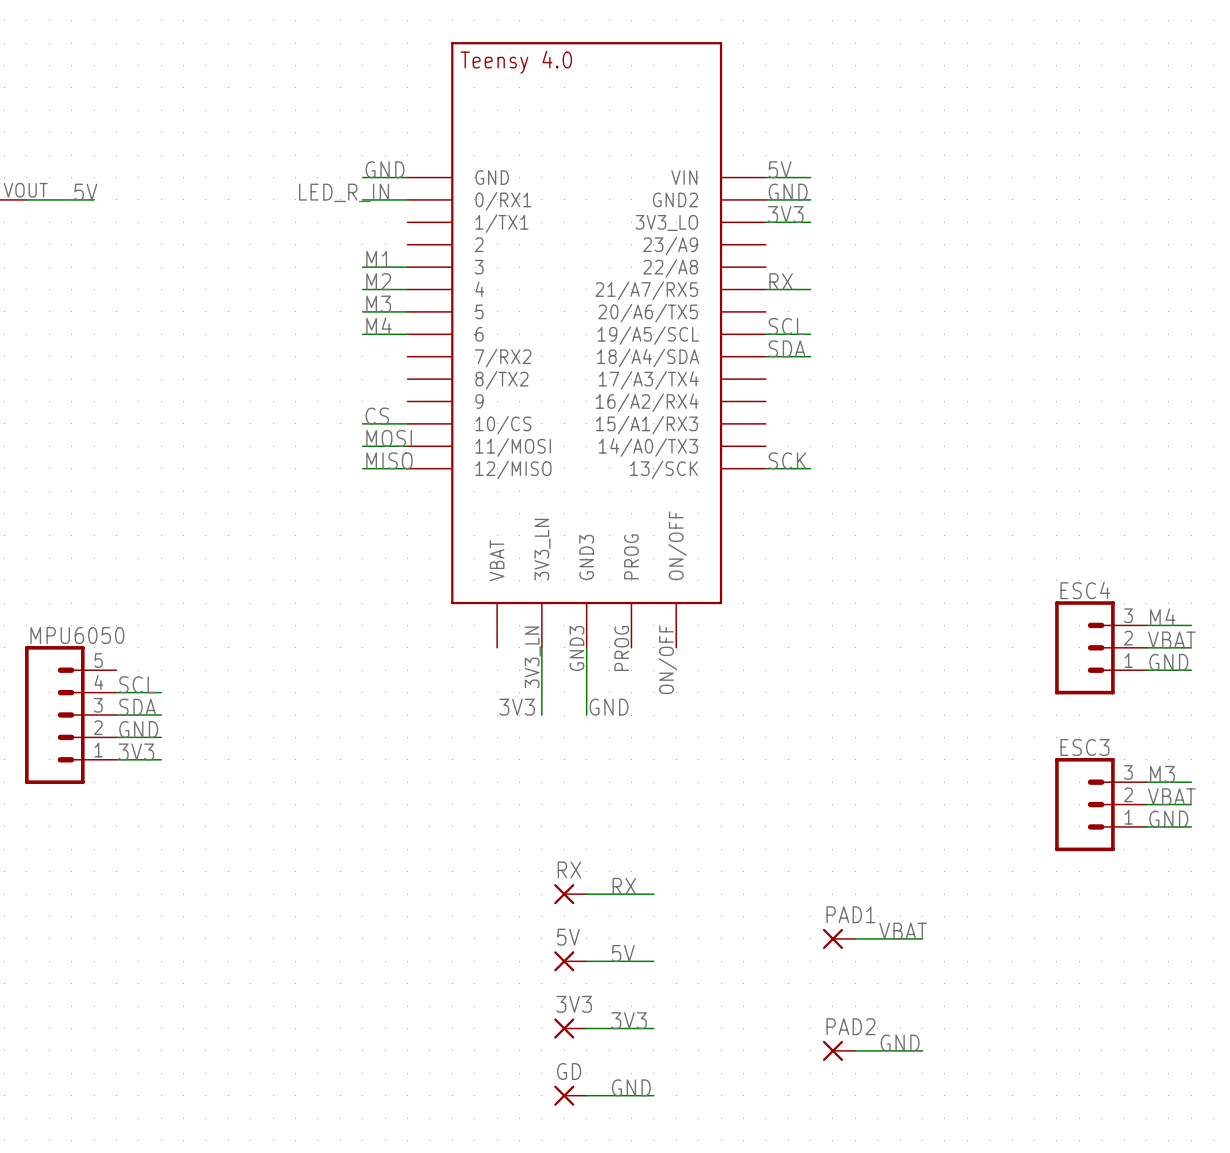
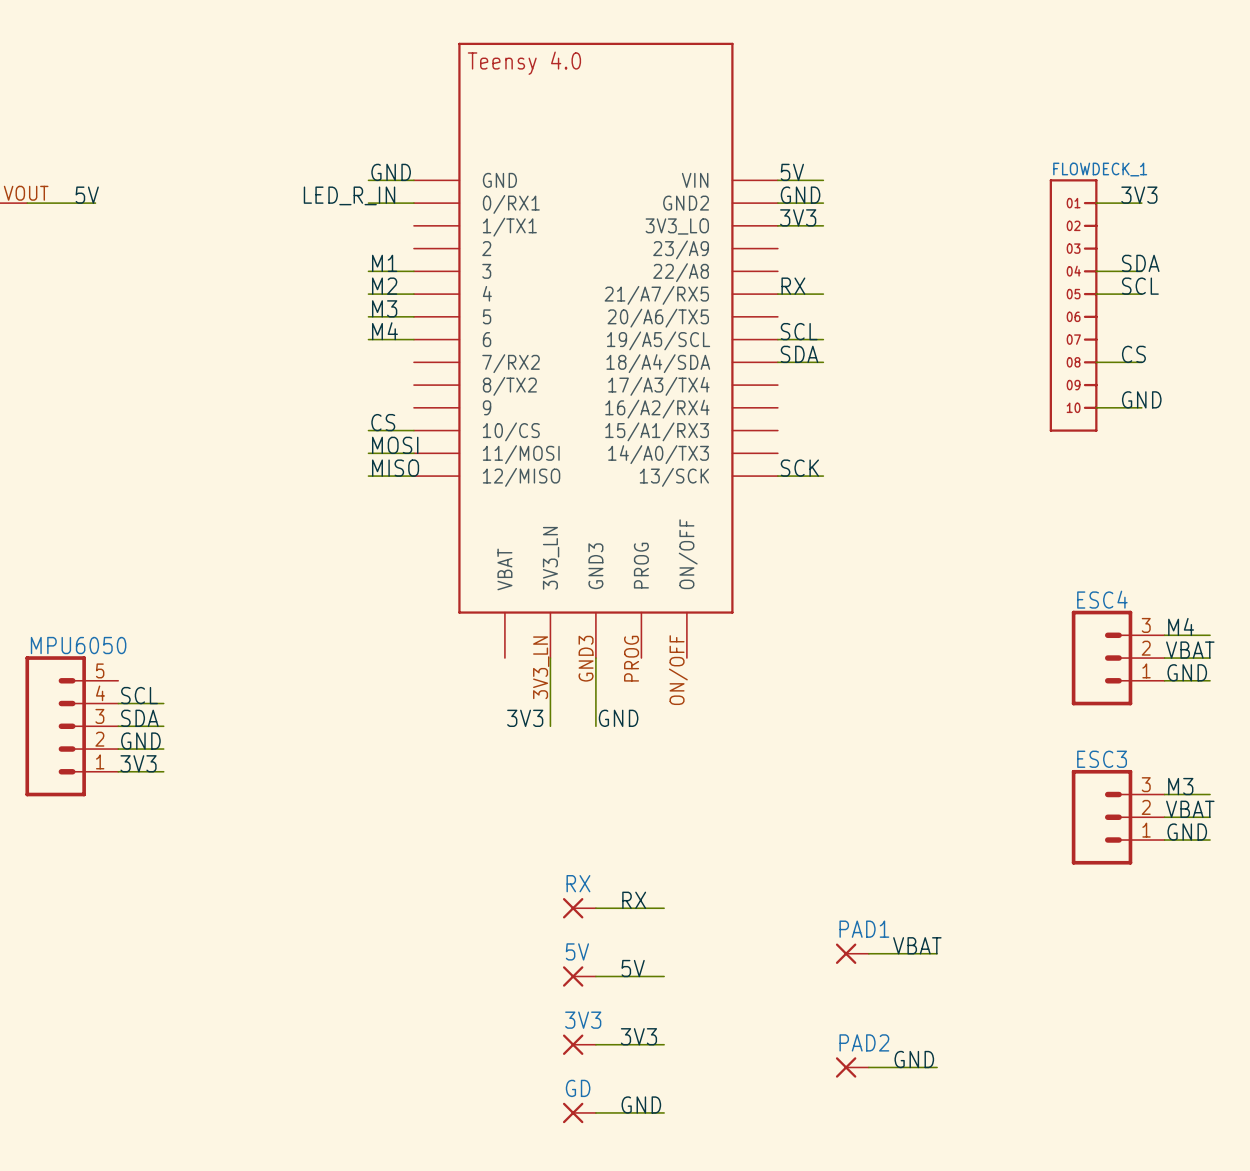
label: none -> 3V3 (1139, 195)
wire: none -> (1096, 203) (1141, 203)
label: none -> SDA (1140, 263)
wire: none -> (1096, 271) (1141, 271)
label: none -> SCL (1140, 286)
wire: none -> (1096, 294) (1141, 294)
FLOWDECK_1: none -> (1073, 305)
label: none -> CS (1133, 354)
wire: none -> (1096, 362) (1141, 362)
label: none -> GND (1141, 399)
wire: none -> (1096, 407) (1141, 407)

